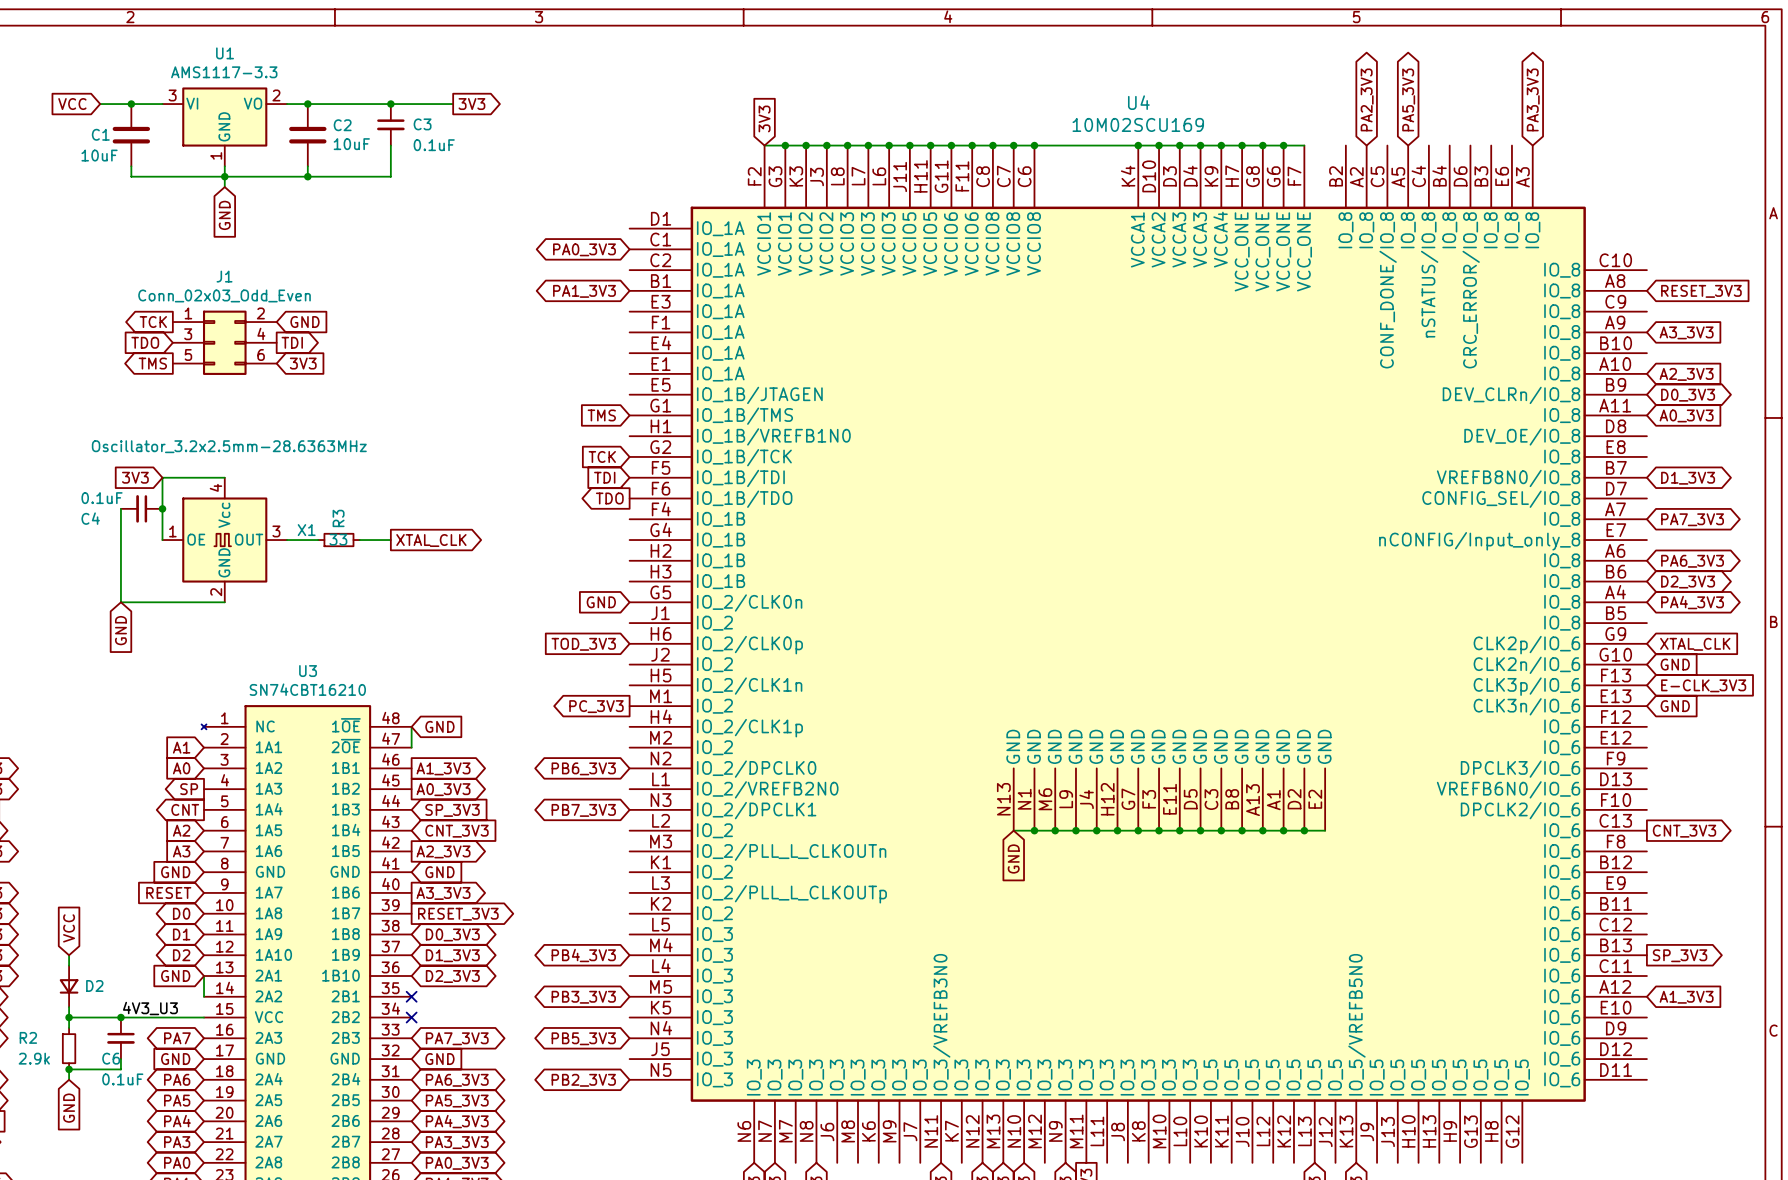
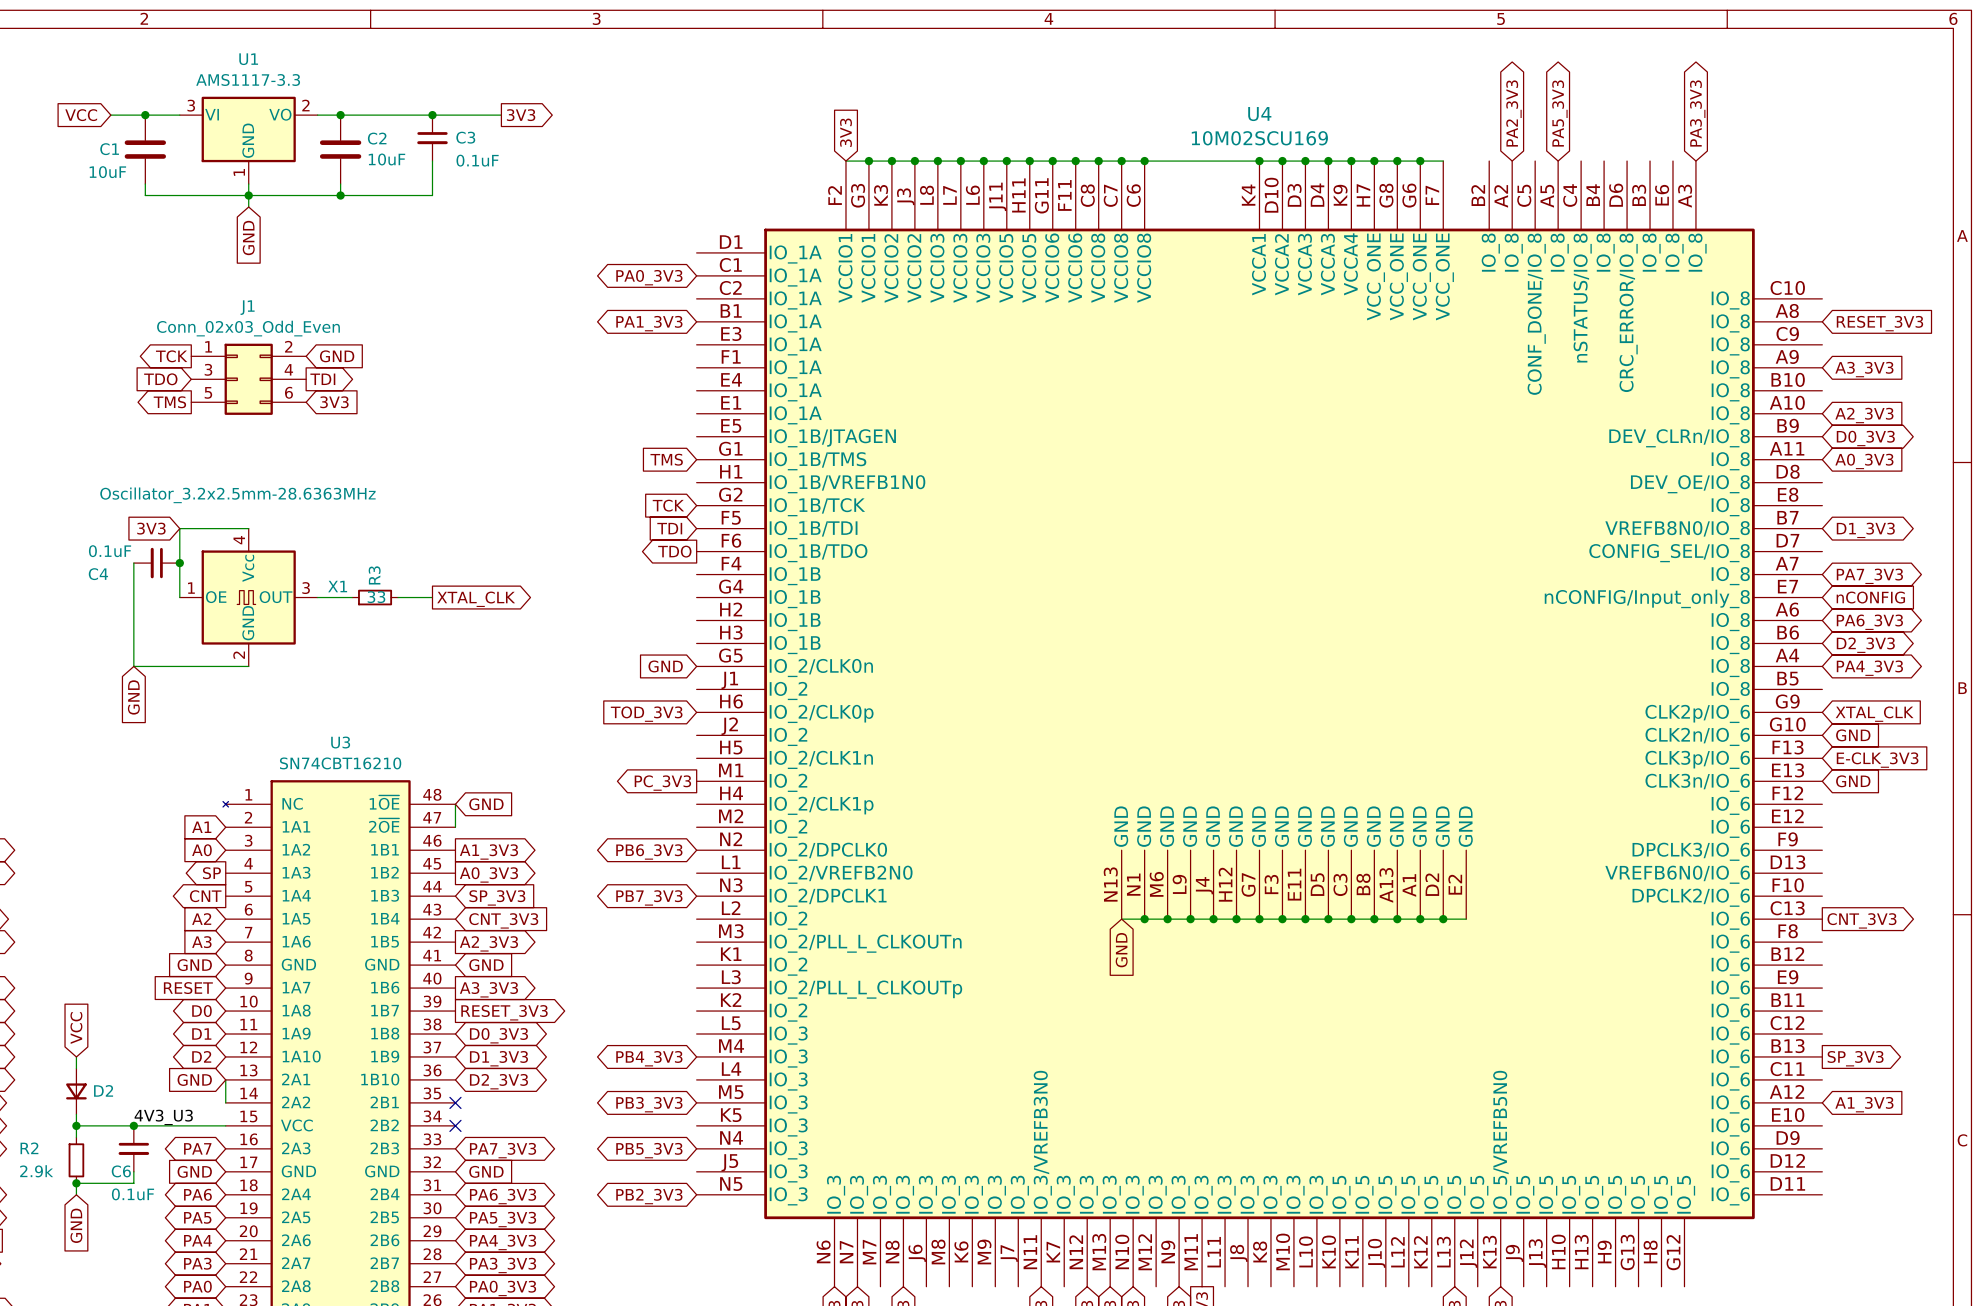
global label: none -> nCONFIG (1870, 597)

